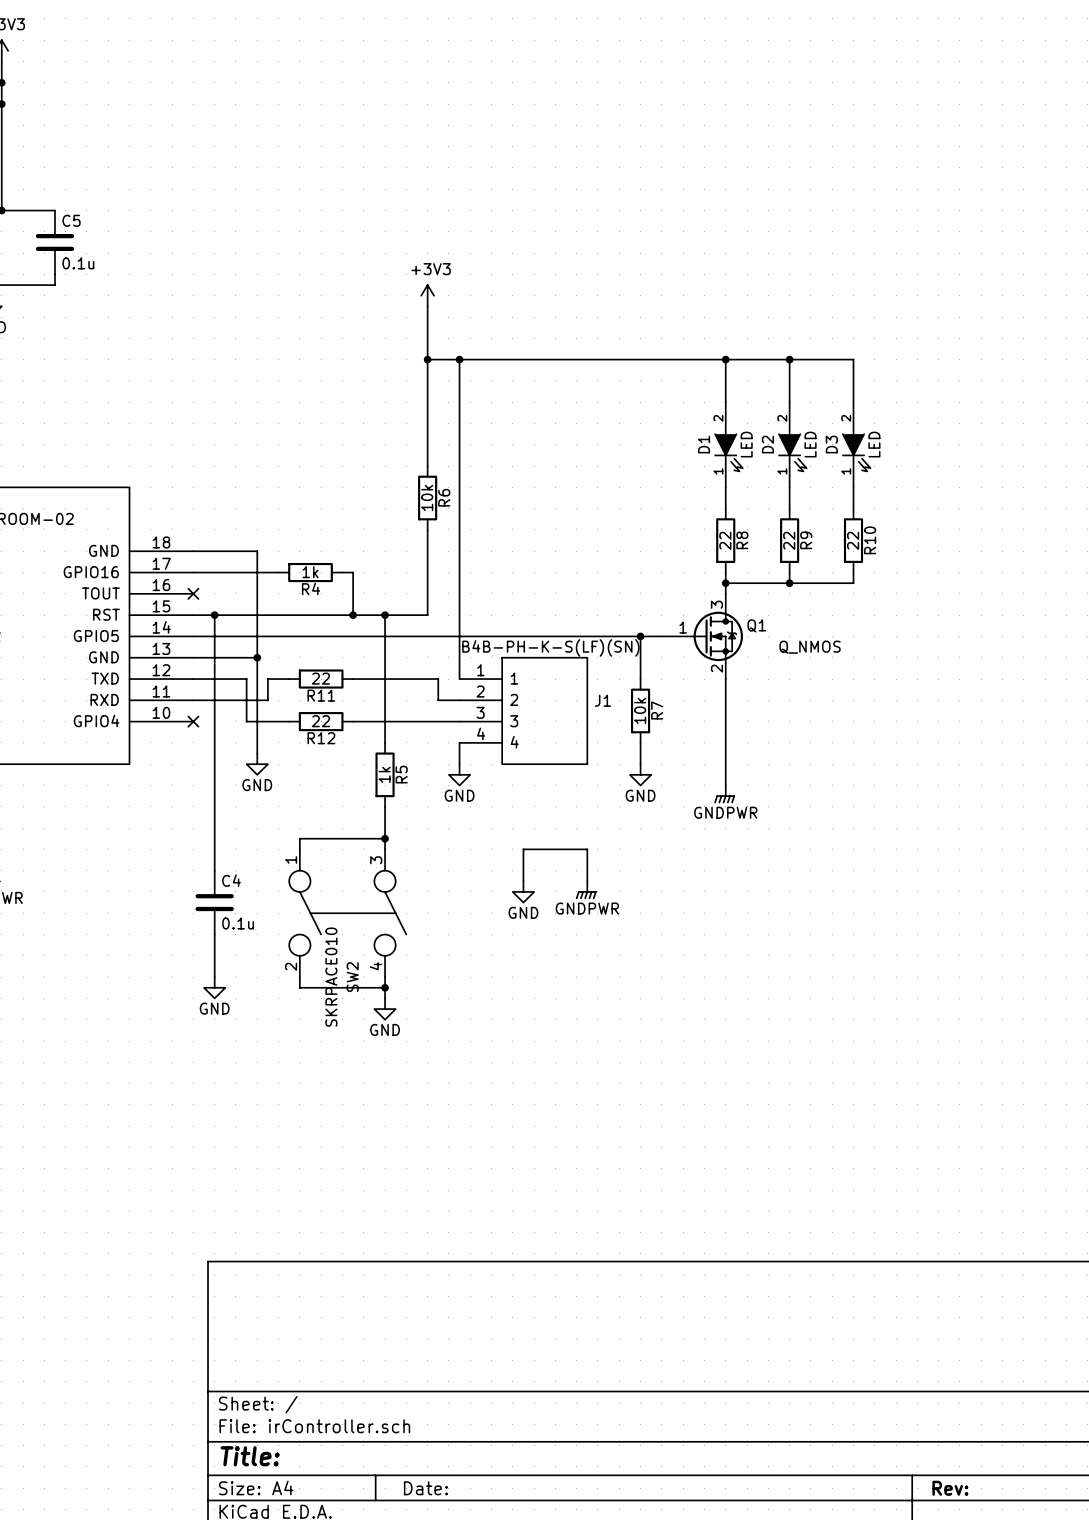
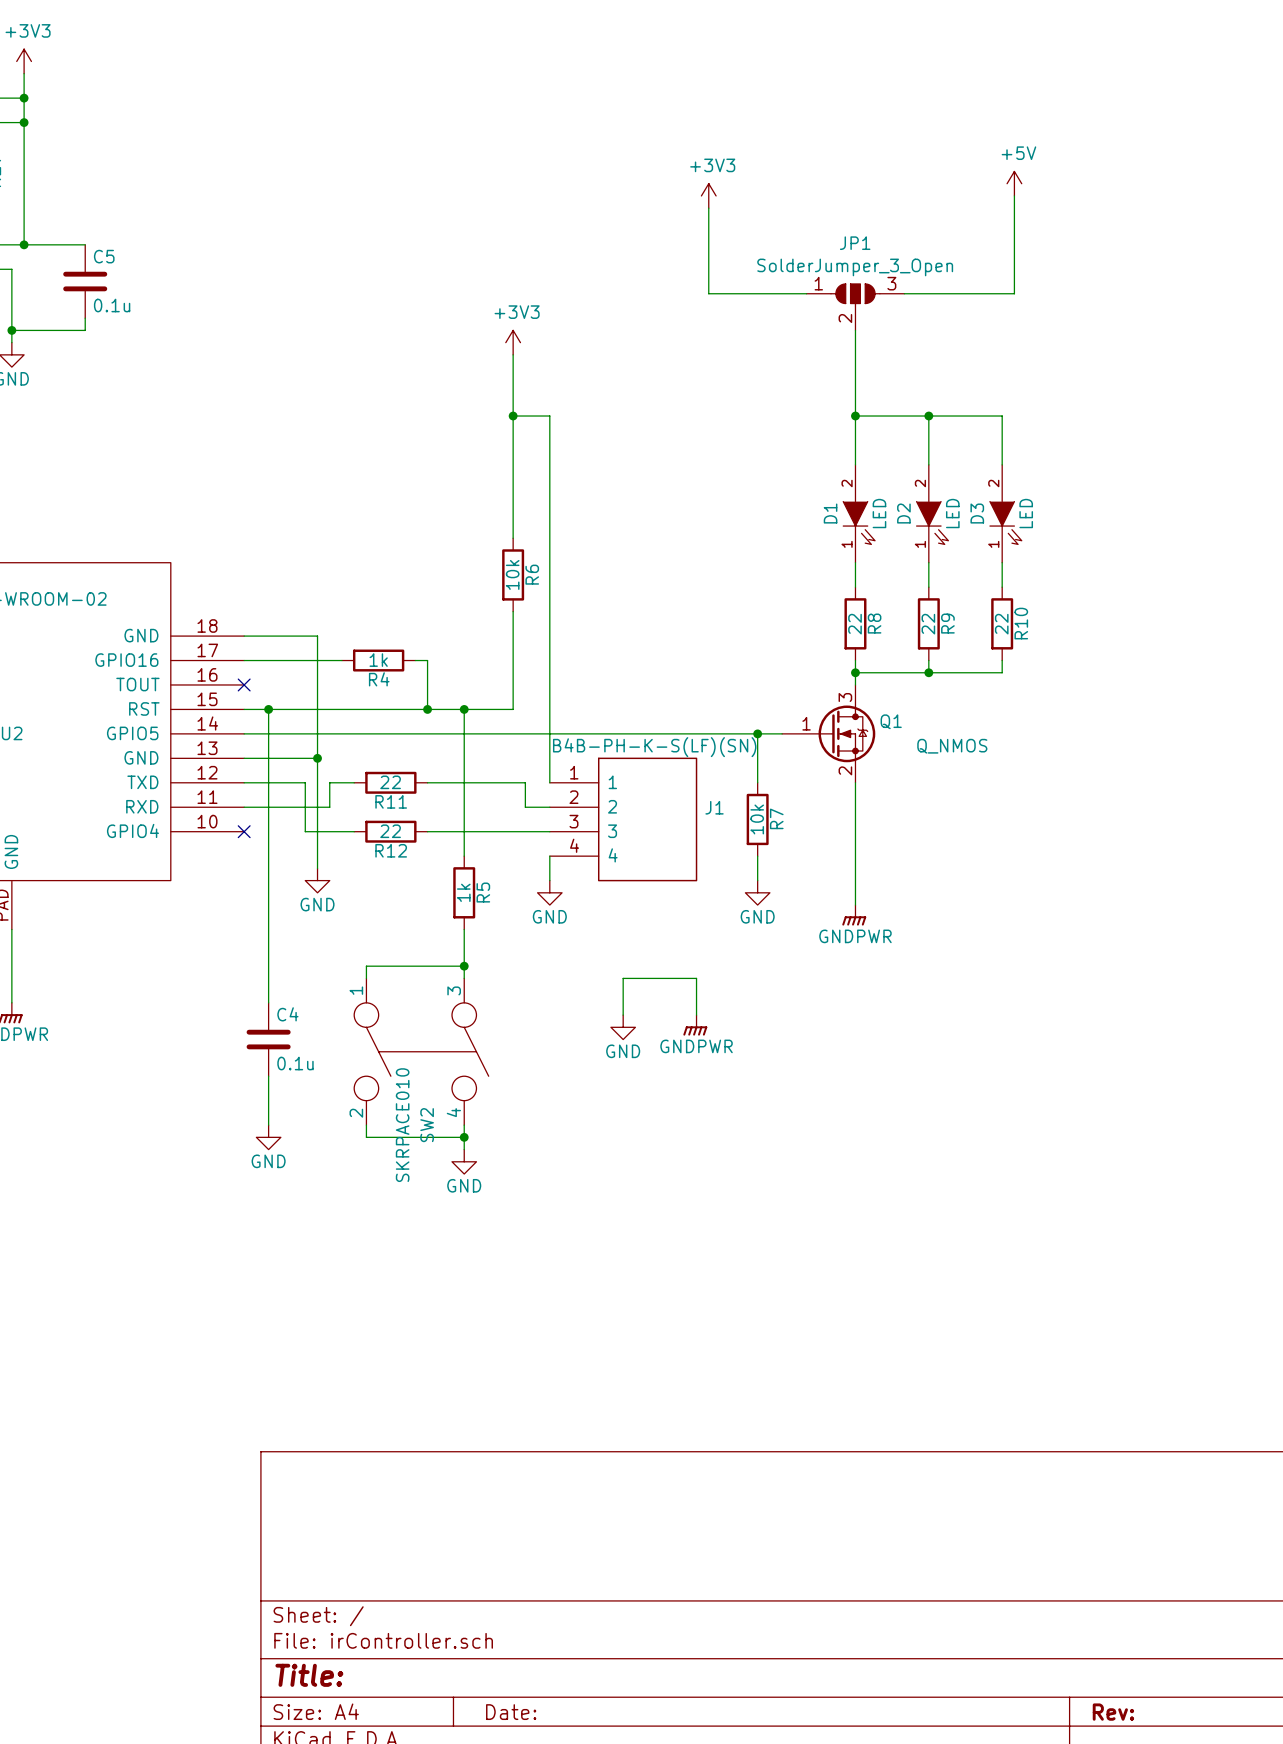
power symbol: none -> +5V (1014, 183)
power symbol: none -> +3V3 (708, 195)
wire: none -> (1014, 195) (1014, 293) (904, 293)
wire: none -> (708, 208) (708, 293) (806, 293)
JP1: none -> SolderJumper_3_Open (855, 307)
wire: (459, 359) (725, 359) -> (855, 330) (855, 416)
junction: (459, 359) -> none

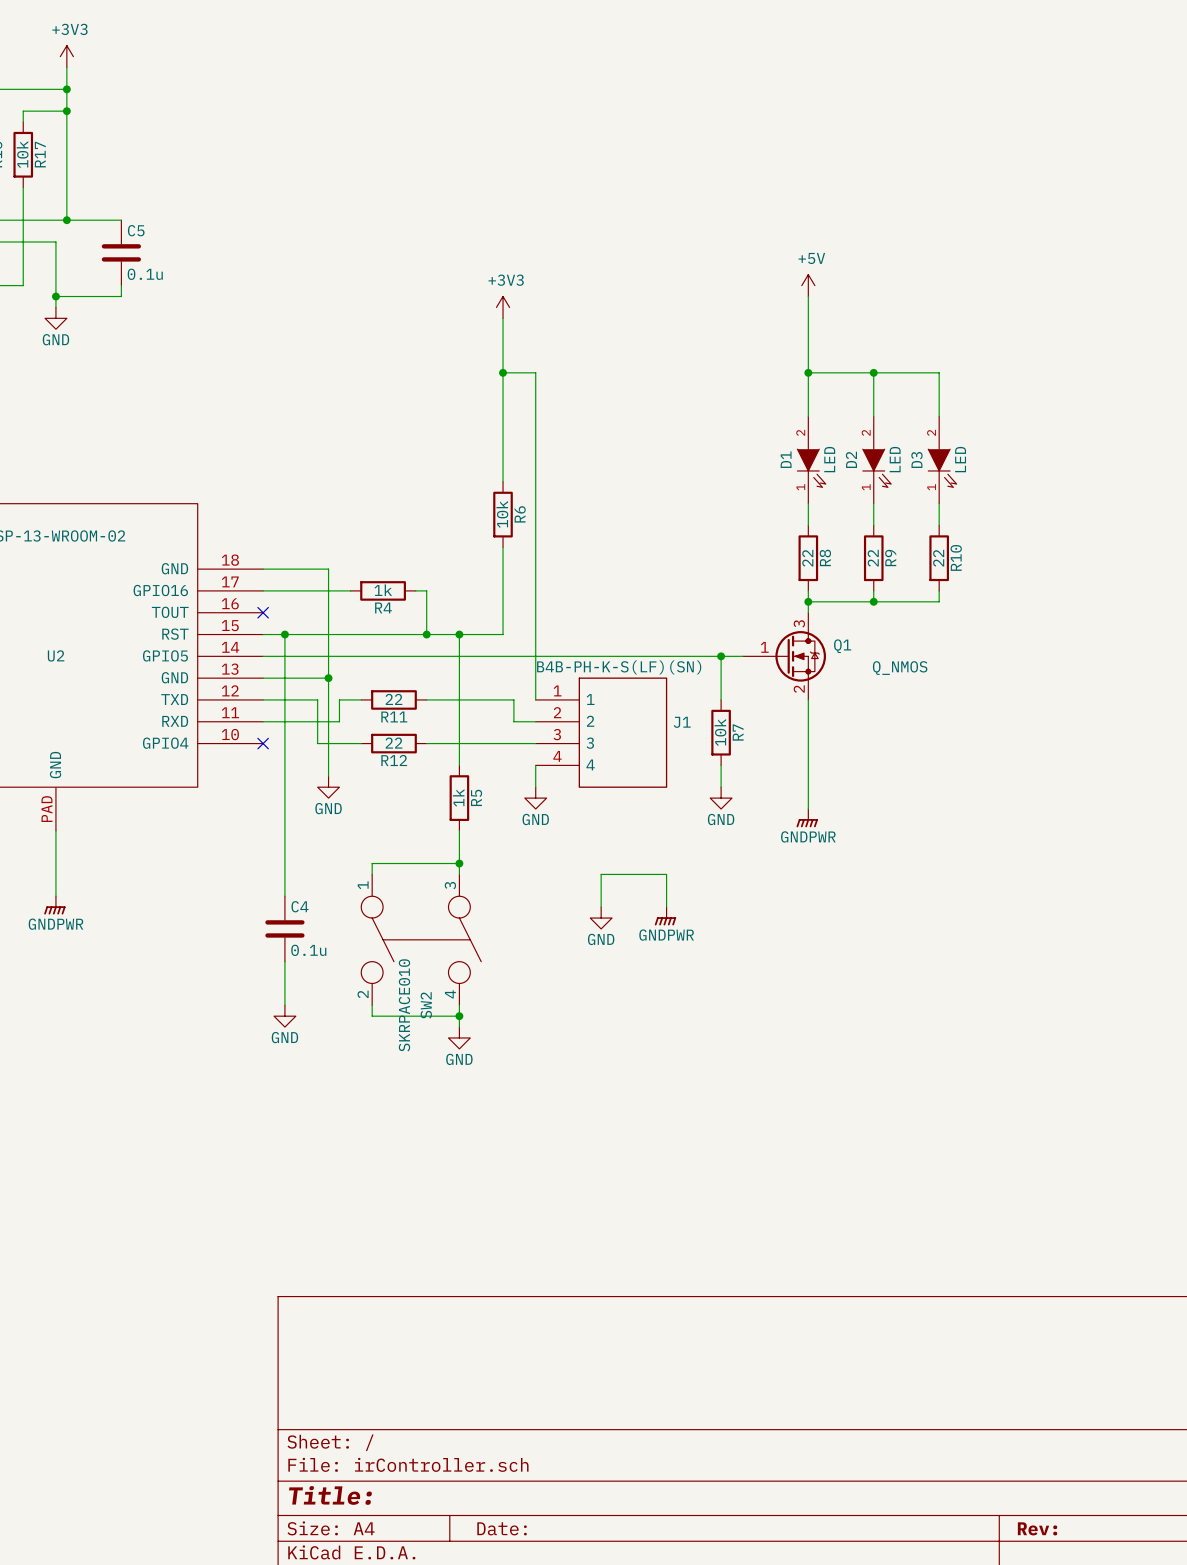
power symbol position: +5V (1014, 183) -> +5V (808, 285)
power symbol: +3V3 (708, 195) -> none
wire: (1014, 195) (1014, 293) (904, 293) -> none
wire: (708, 208) (708, 293) (806, 293) -> none
JP1: SolderJumper_3_Open (855, 307) -> none

